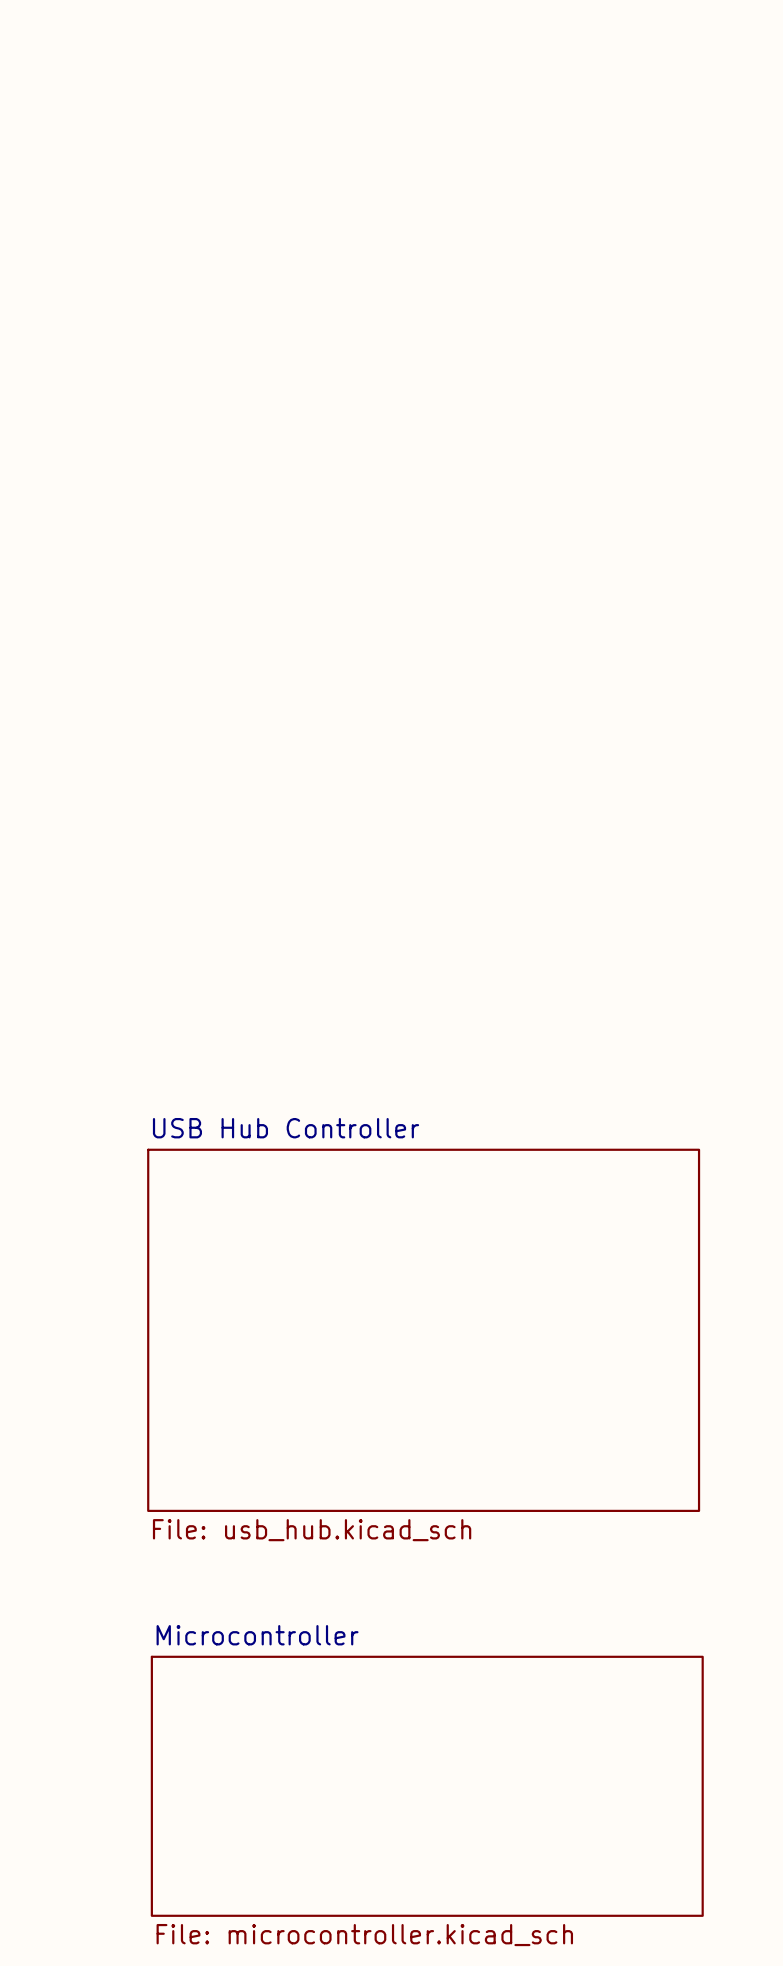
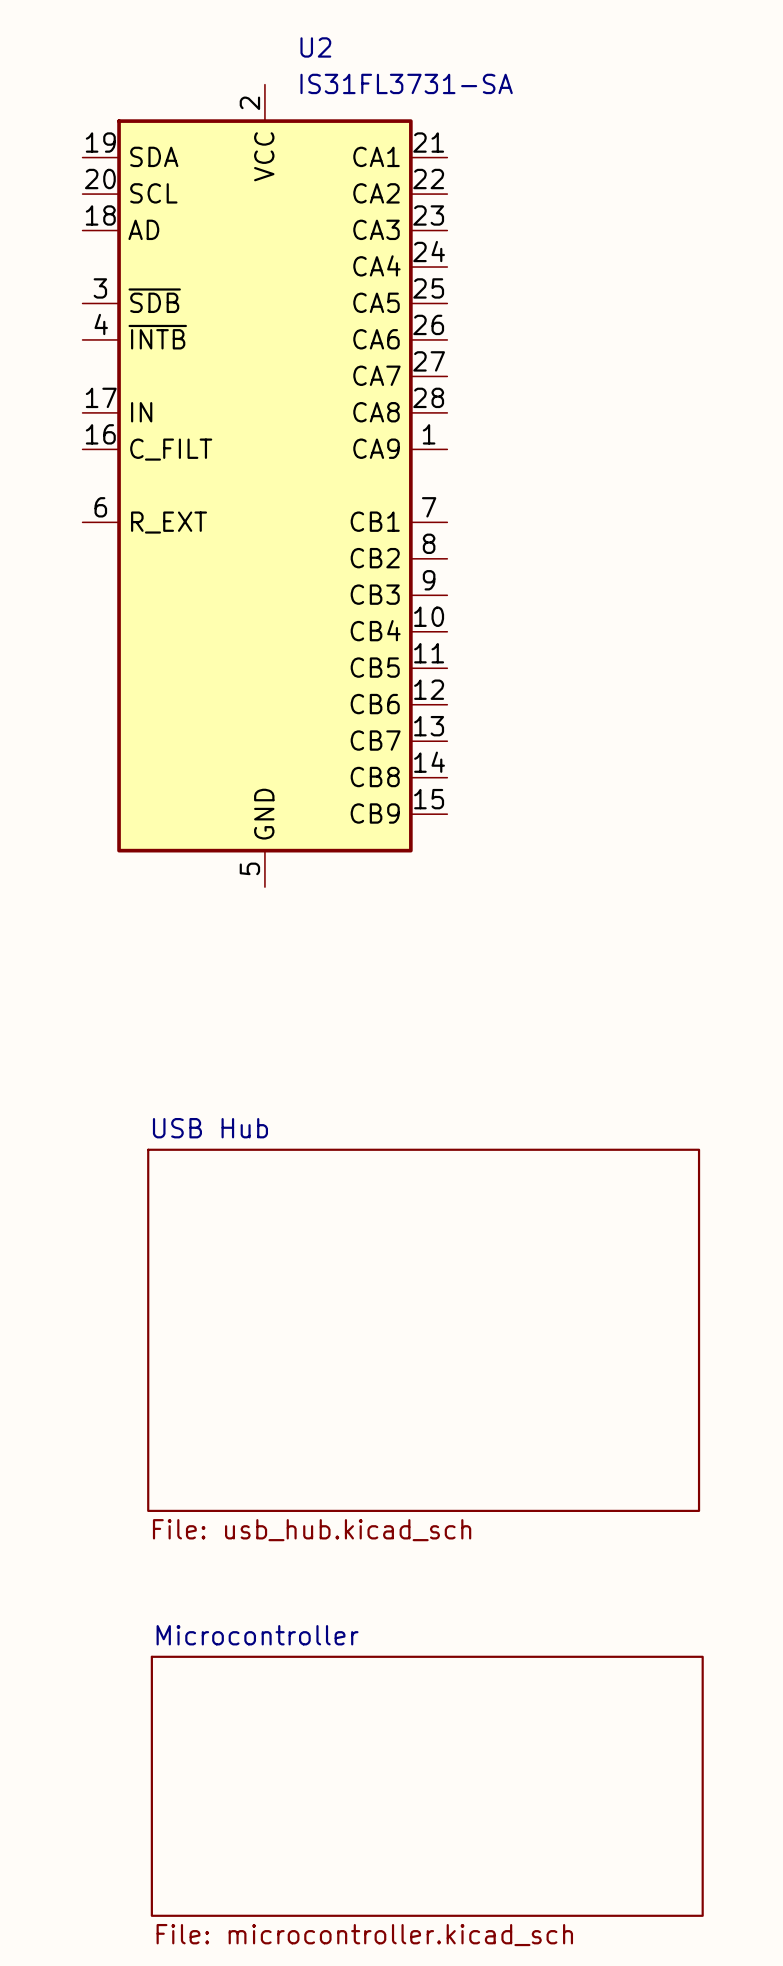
U2: none -> IS31FL3731-SA (264, 485)
sheet USB Hub Controller name: USB Hub Controller (286, 1128) -> USB Hub (210, 1128)

